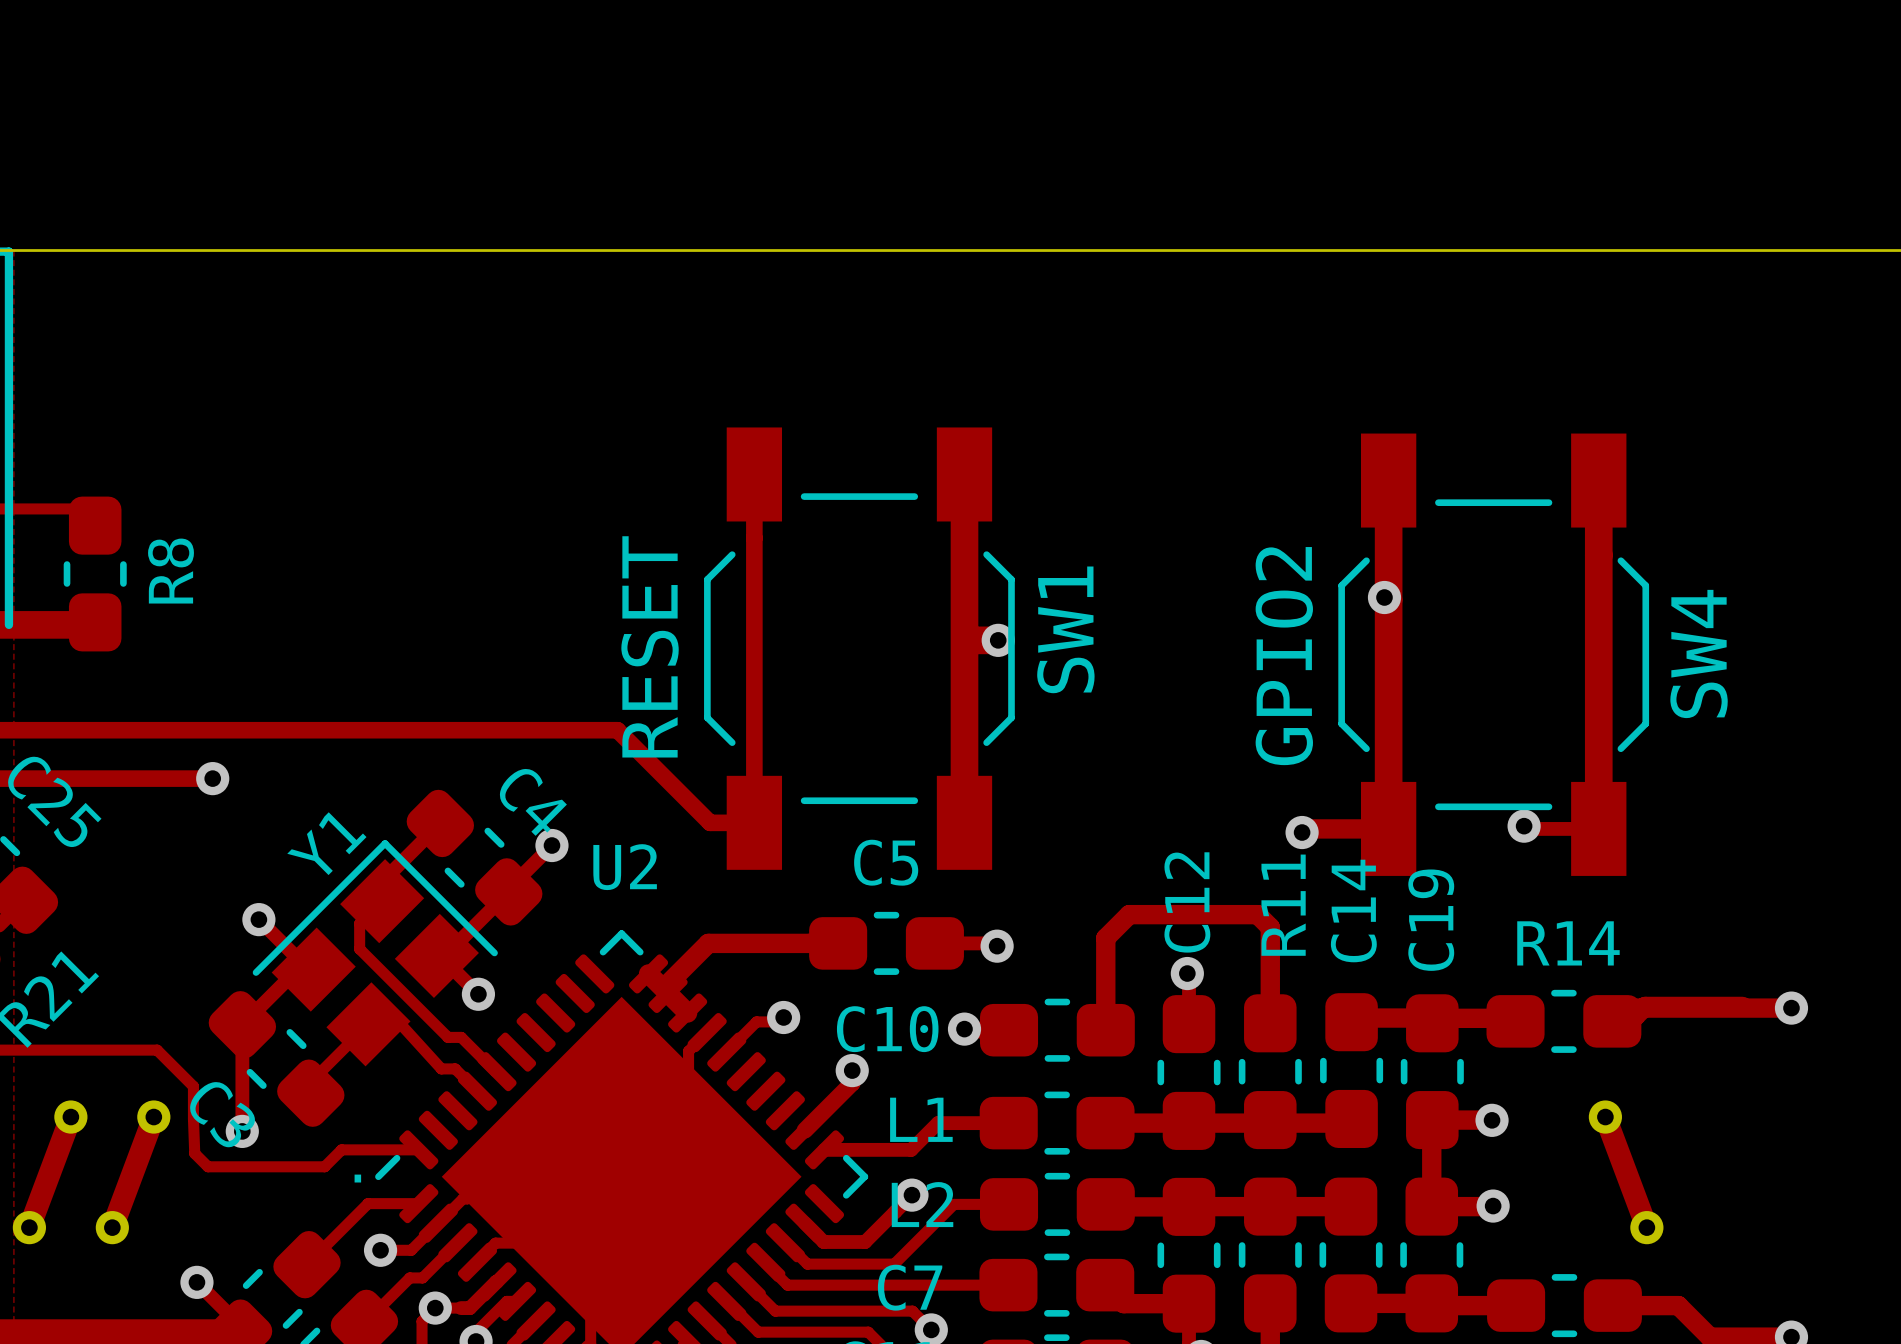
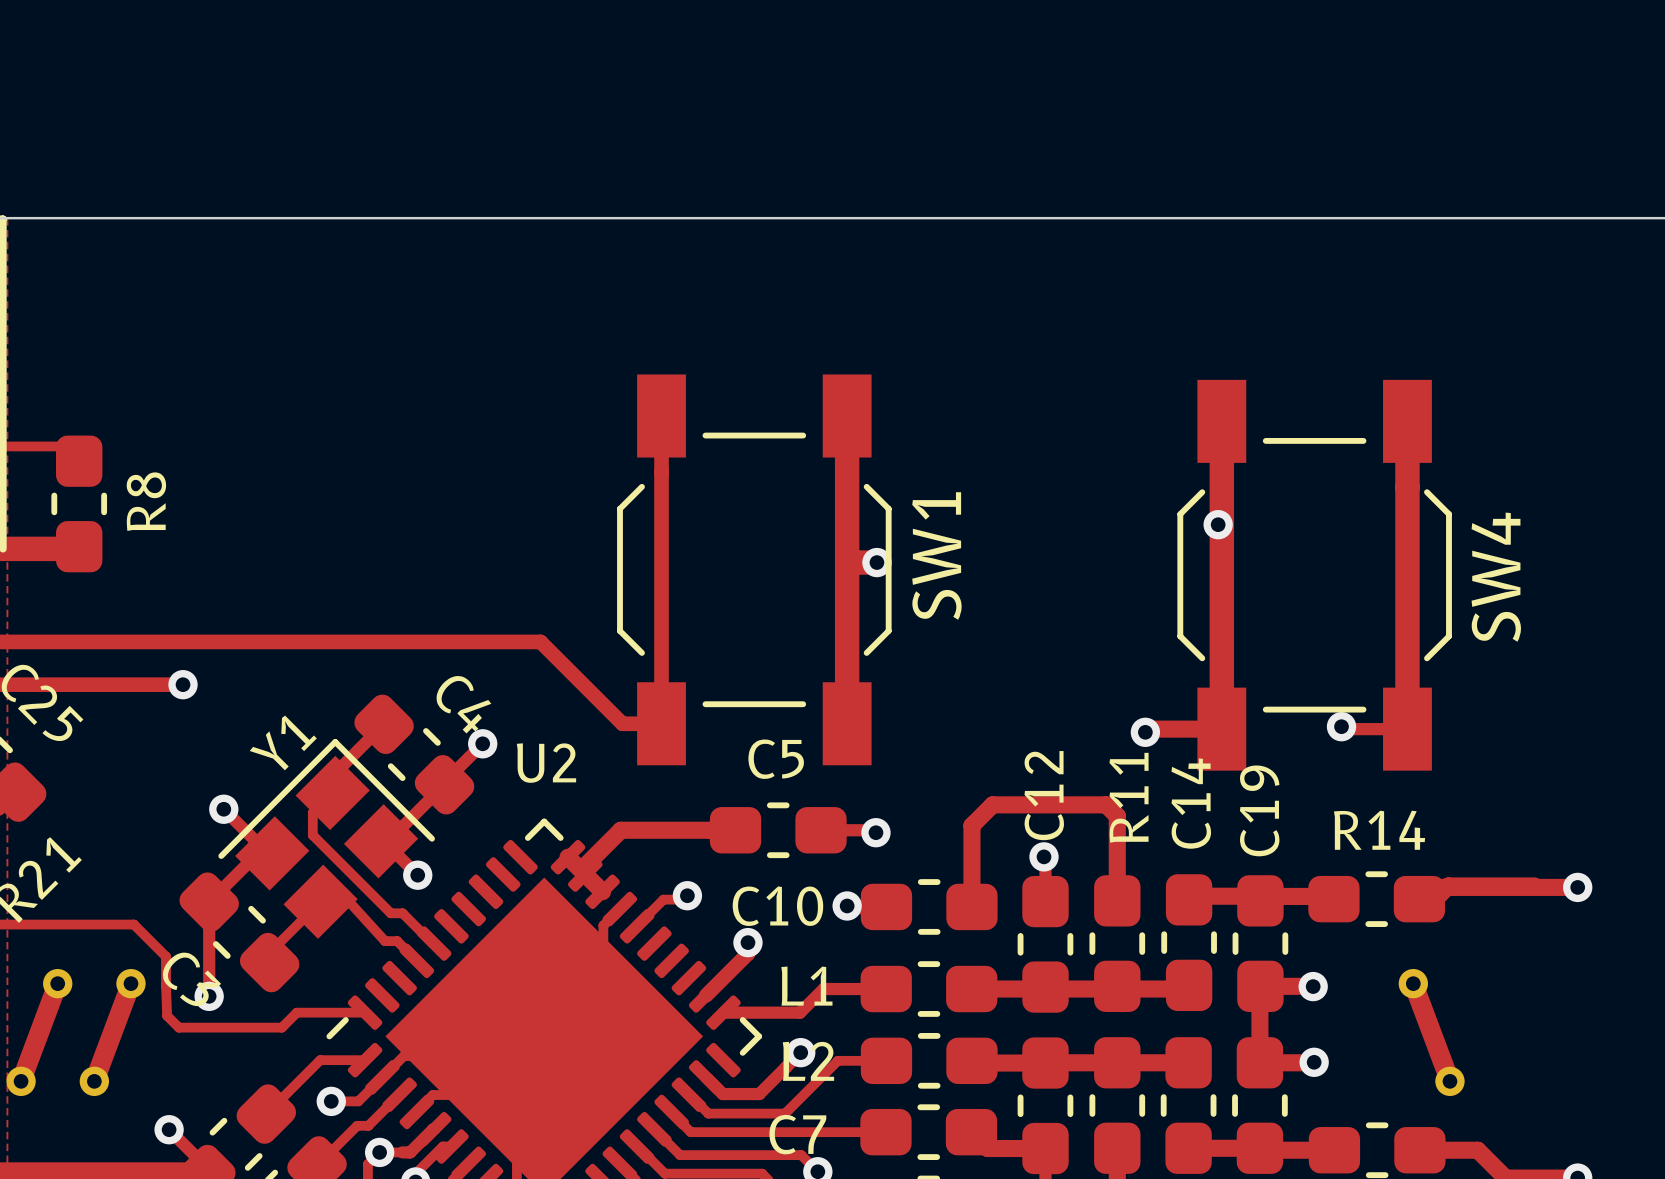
SW1 value: RESET (650, 646) -> none
SW4 value: GPIO2 (1284, 656) -> none
text: . (357, 1178) -> none

